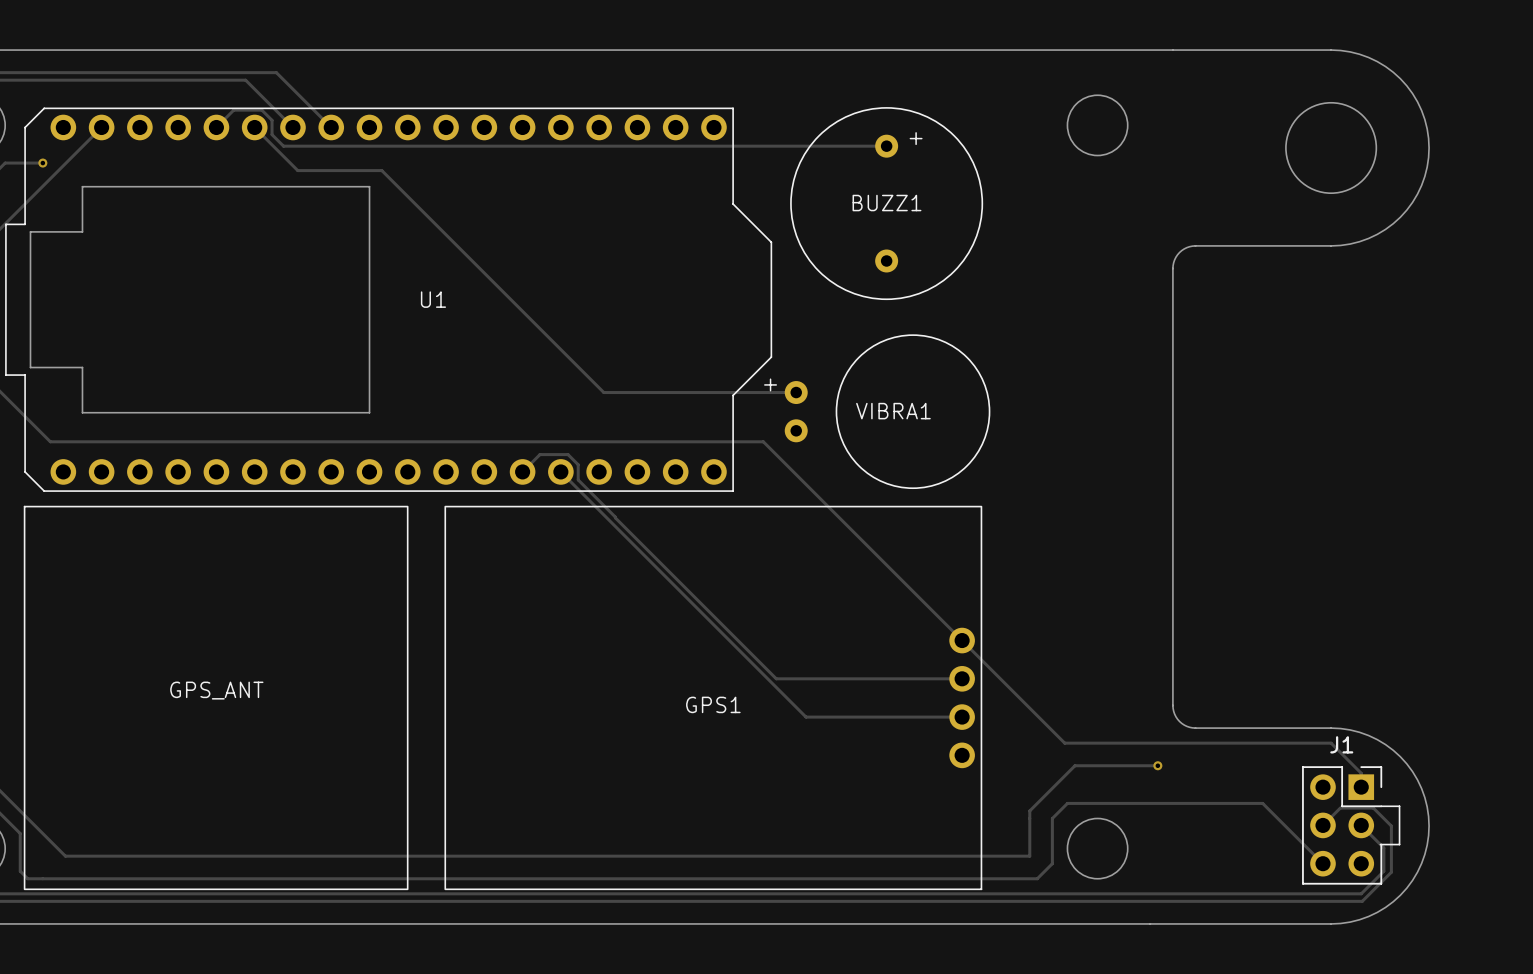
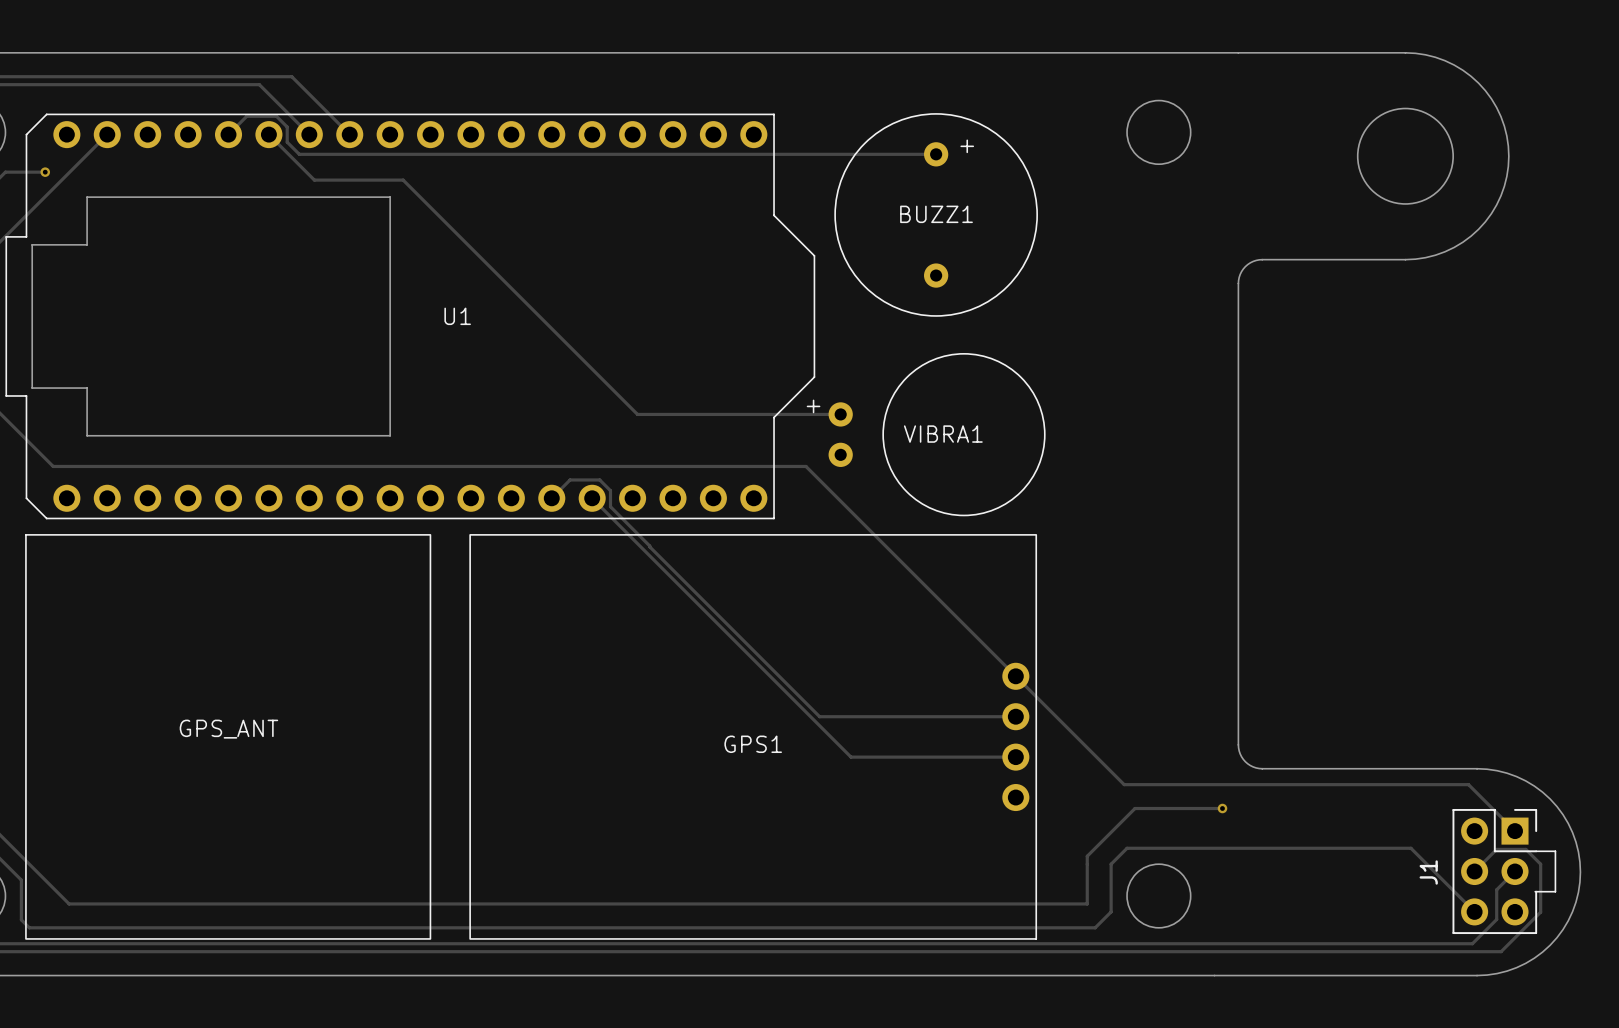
board edge: (1331, 728) (1350, 729) (1368, 735) (1385, 744) (1400, 756) (1412, 771) (1421, 788) (1427, 806) (1429, 826) (1427, 845) (1421, 863) (1412, 880) (1400, 895) (1385, 907) (1368, 916) (1350, 922) (1331, 923) -> (1405, 768) (1487, 769) (1507, 773) (1525, 780) (1550, 799) (1563, 814) (1575, 842) (1580, 872) (1575, 902) (1563, 929) (1550, 945) (1525, 963) (1507, 971) (1487, 975) (1405, 975)
track: (1331, 743) (1361, 773) (1361, 787) -> (1405, 784) (1468, 784) (1515, 831)
J1 name rotation: 0° (1341, 744) -> 90° counterclockwise (1428, 872)
J1 name position: J1 (1341, 744) -> J1 (1428, 872)
track: (1262, 803) (1322, 863) -> (1333, 848) (1410, 848) (1474, 911)
track: (1322, 825) (1340, 808) (1373, 808) (1391, 826) (1391, 872) (1362, 901) -> (1474, 871) (1496, 849) (1525, 849) (1540, 864) (1540, 912) (1501, 951) (1438, 951)
J1 position: (1351, 825) -> (1504, 871)
track: (1361, 825) (1383, 848) (1383, 871) (1361, 893) -> (1515, 871) (1496, 889) (1496, 919) (1472, 943) (1437, 943)

